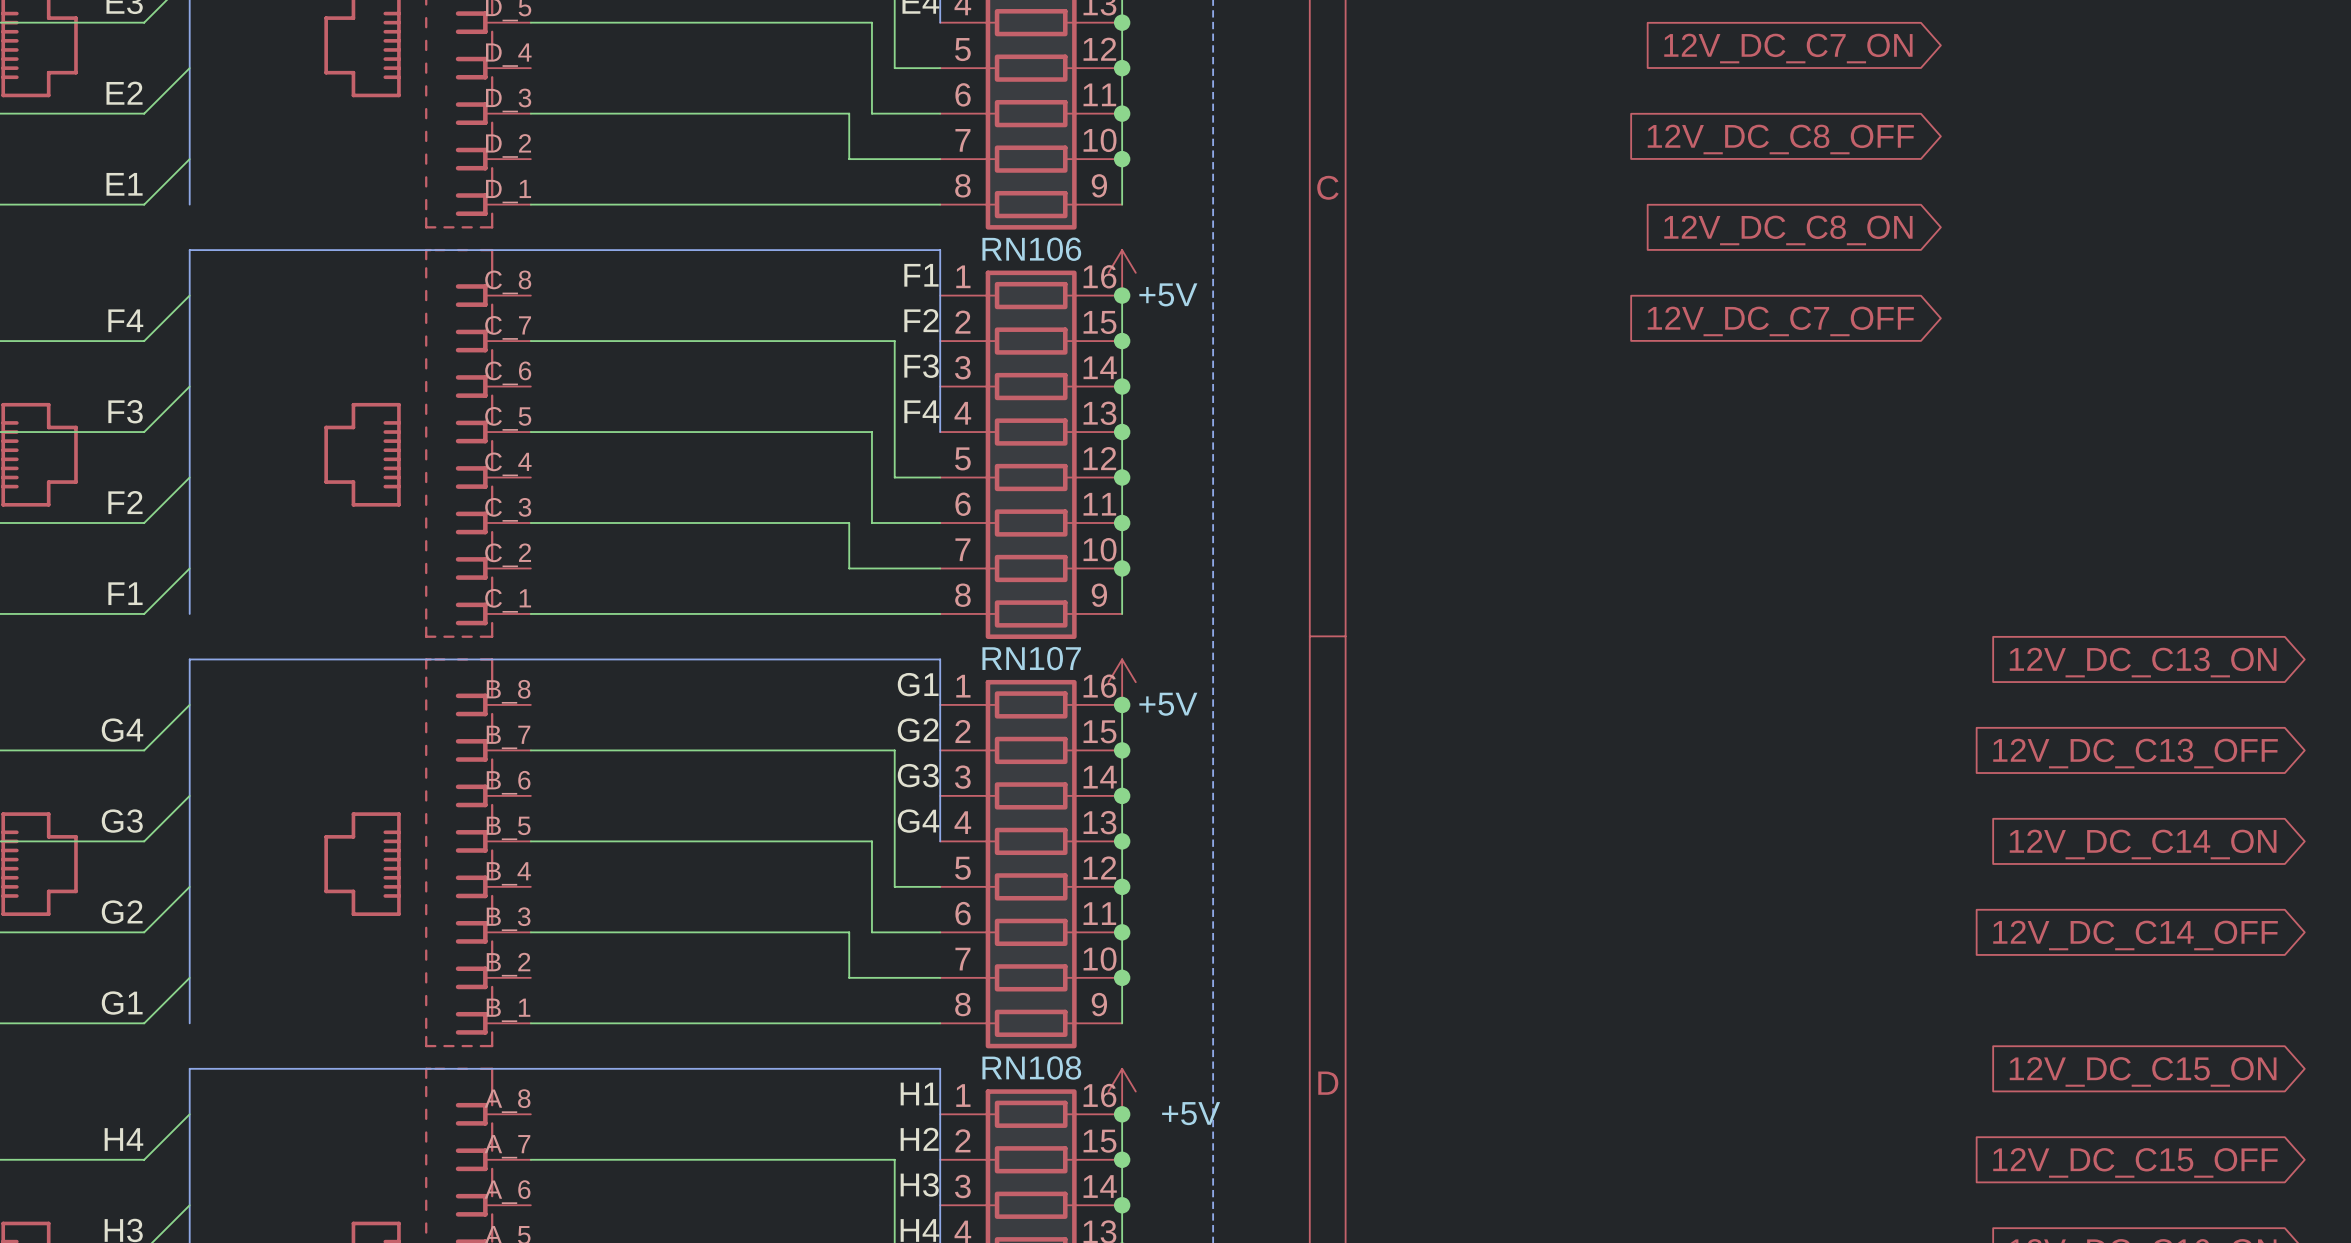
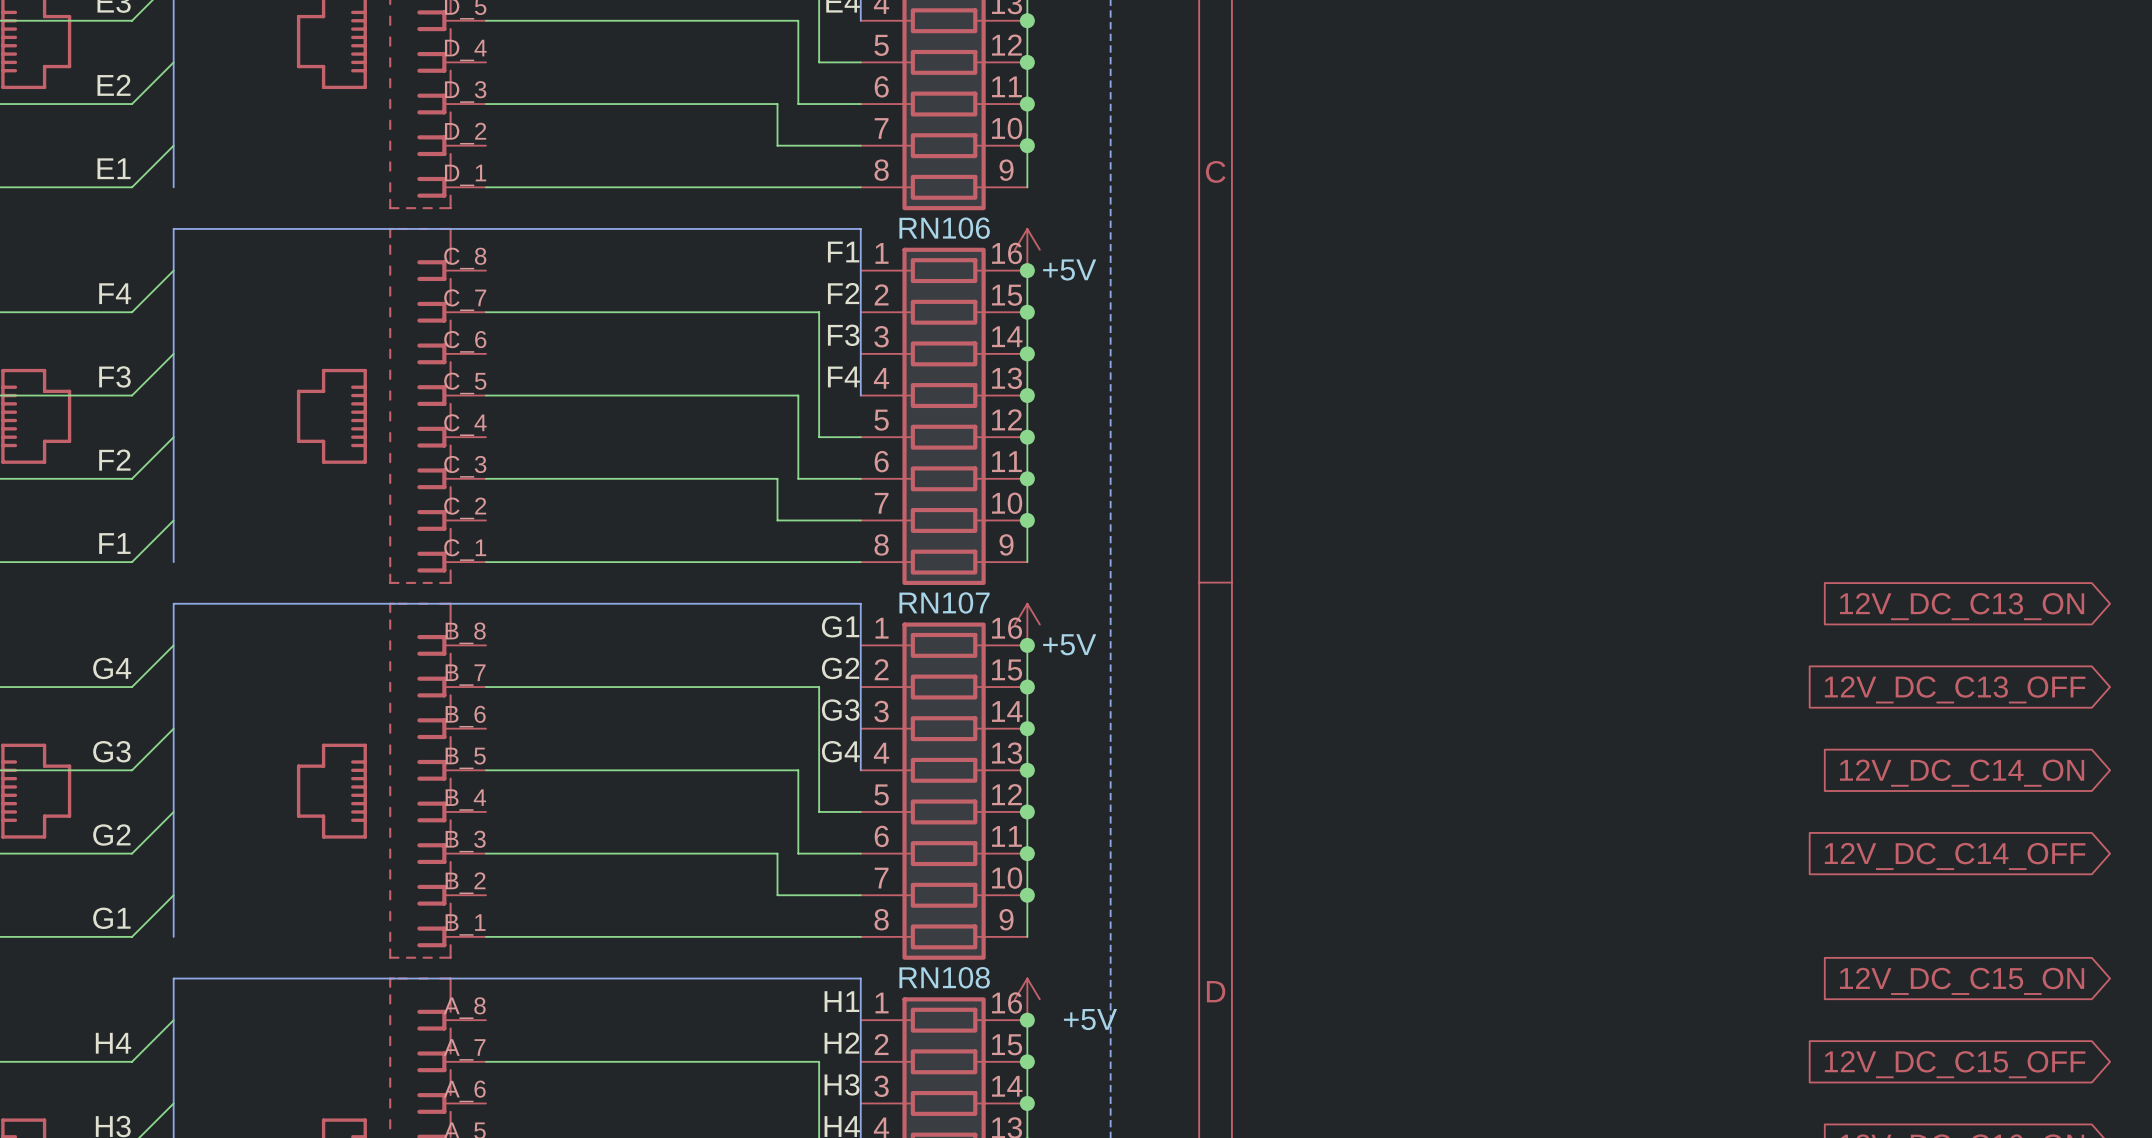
global label: 12V_DC_C7_ON (1788, 48) -> none
global label: 12V_DC_C8_OFF (1780, 139) -> none
global label: 12V_DC_C8_ON (1788, 230) -> none
global label: 12V_DC_C7_OFF (1780, 321) -> none

